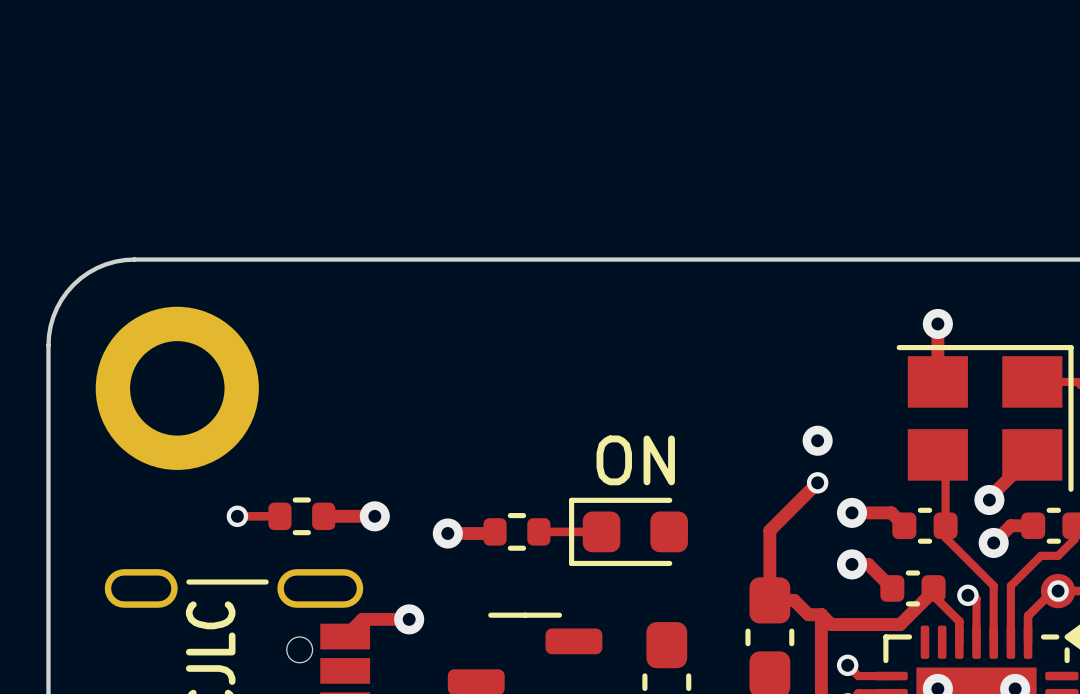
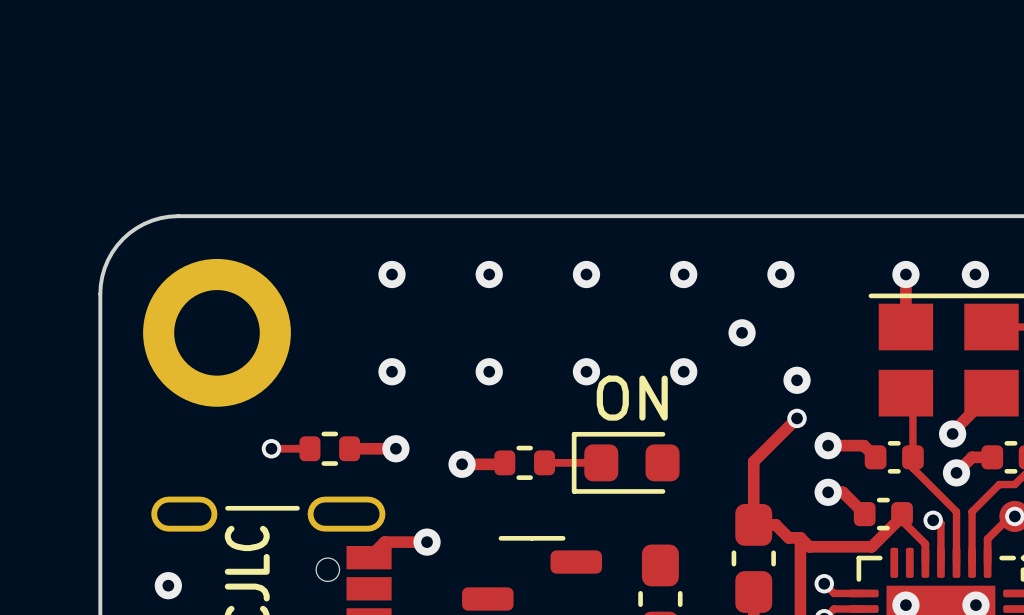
via: none -> (392, 274)
via: none -> (489, 274)
via: none -> (586, 274)
via: none -> (683, 274)
via: none -> (780, 274)
via: none -> (975, 274)
via: none -> (742, 332)
via: none -> (392, 371)
via: none -> (489, 371)
via: none -> (586, 371)
via: none -> (683, 371)
via: none -> (168, 585)

